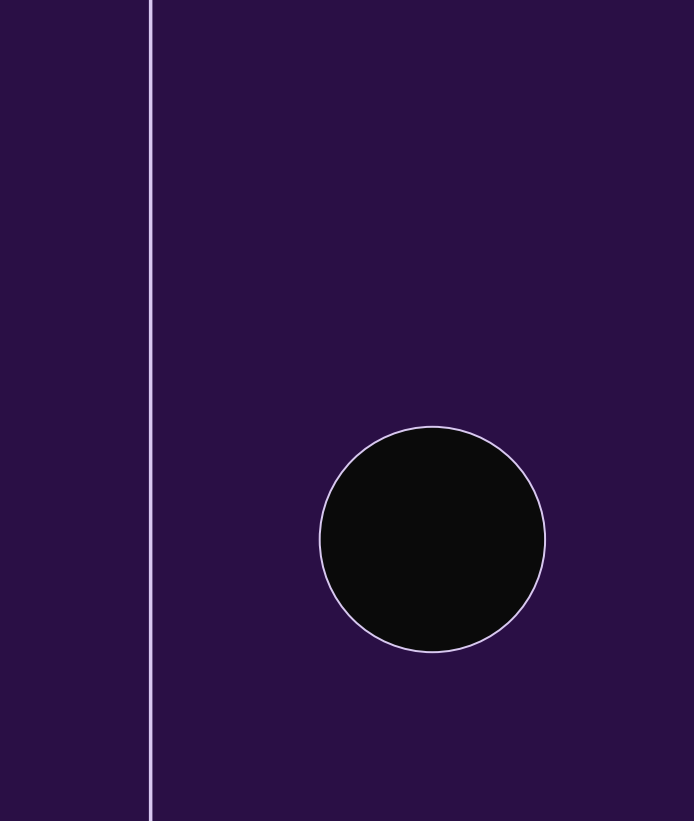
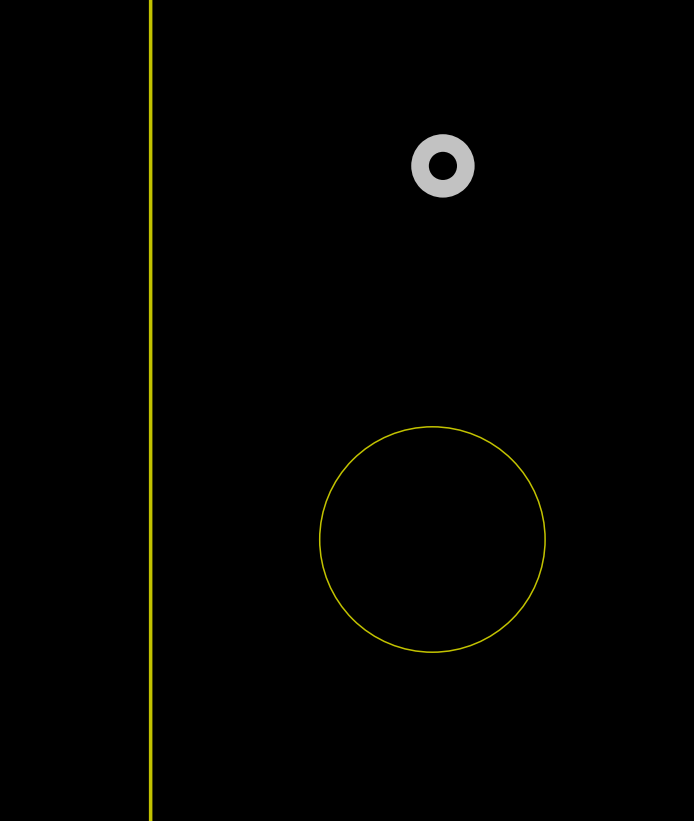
via: none -> (442, 165)

